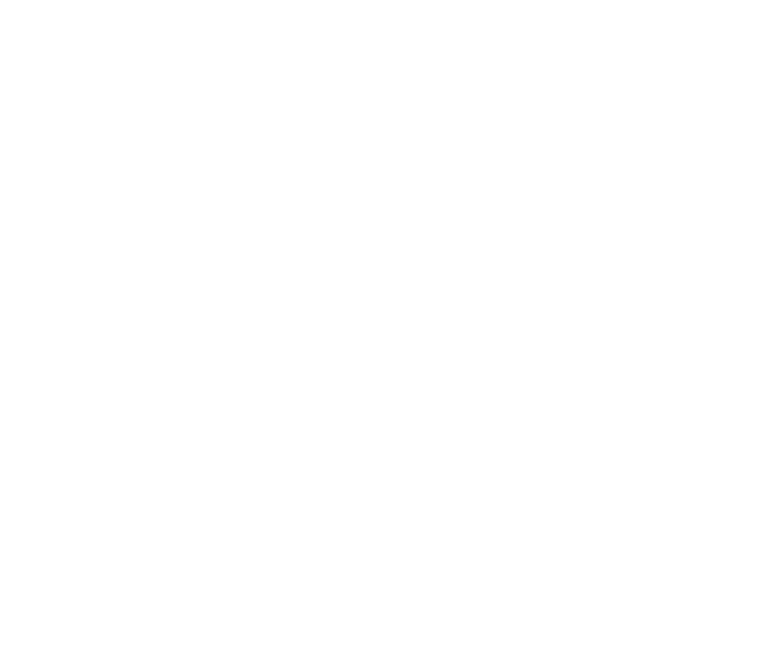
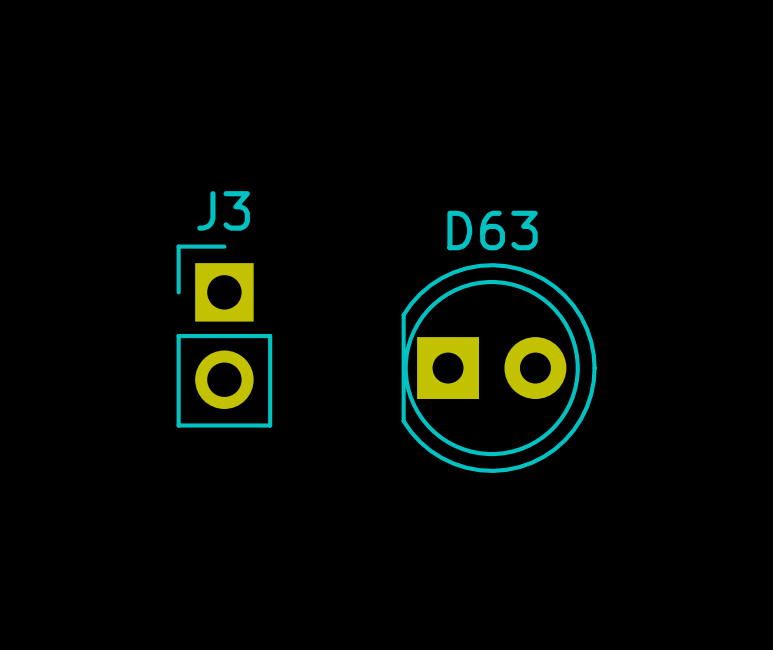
J3: none -> (224, 336)
D63: none -> (499, 368)

